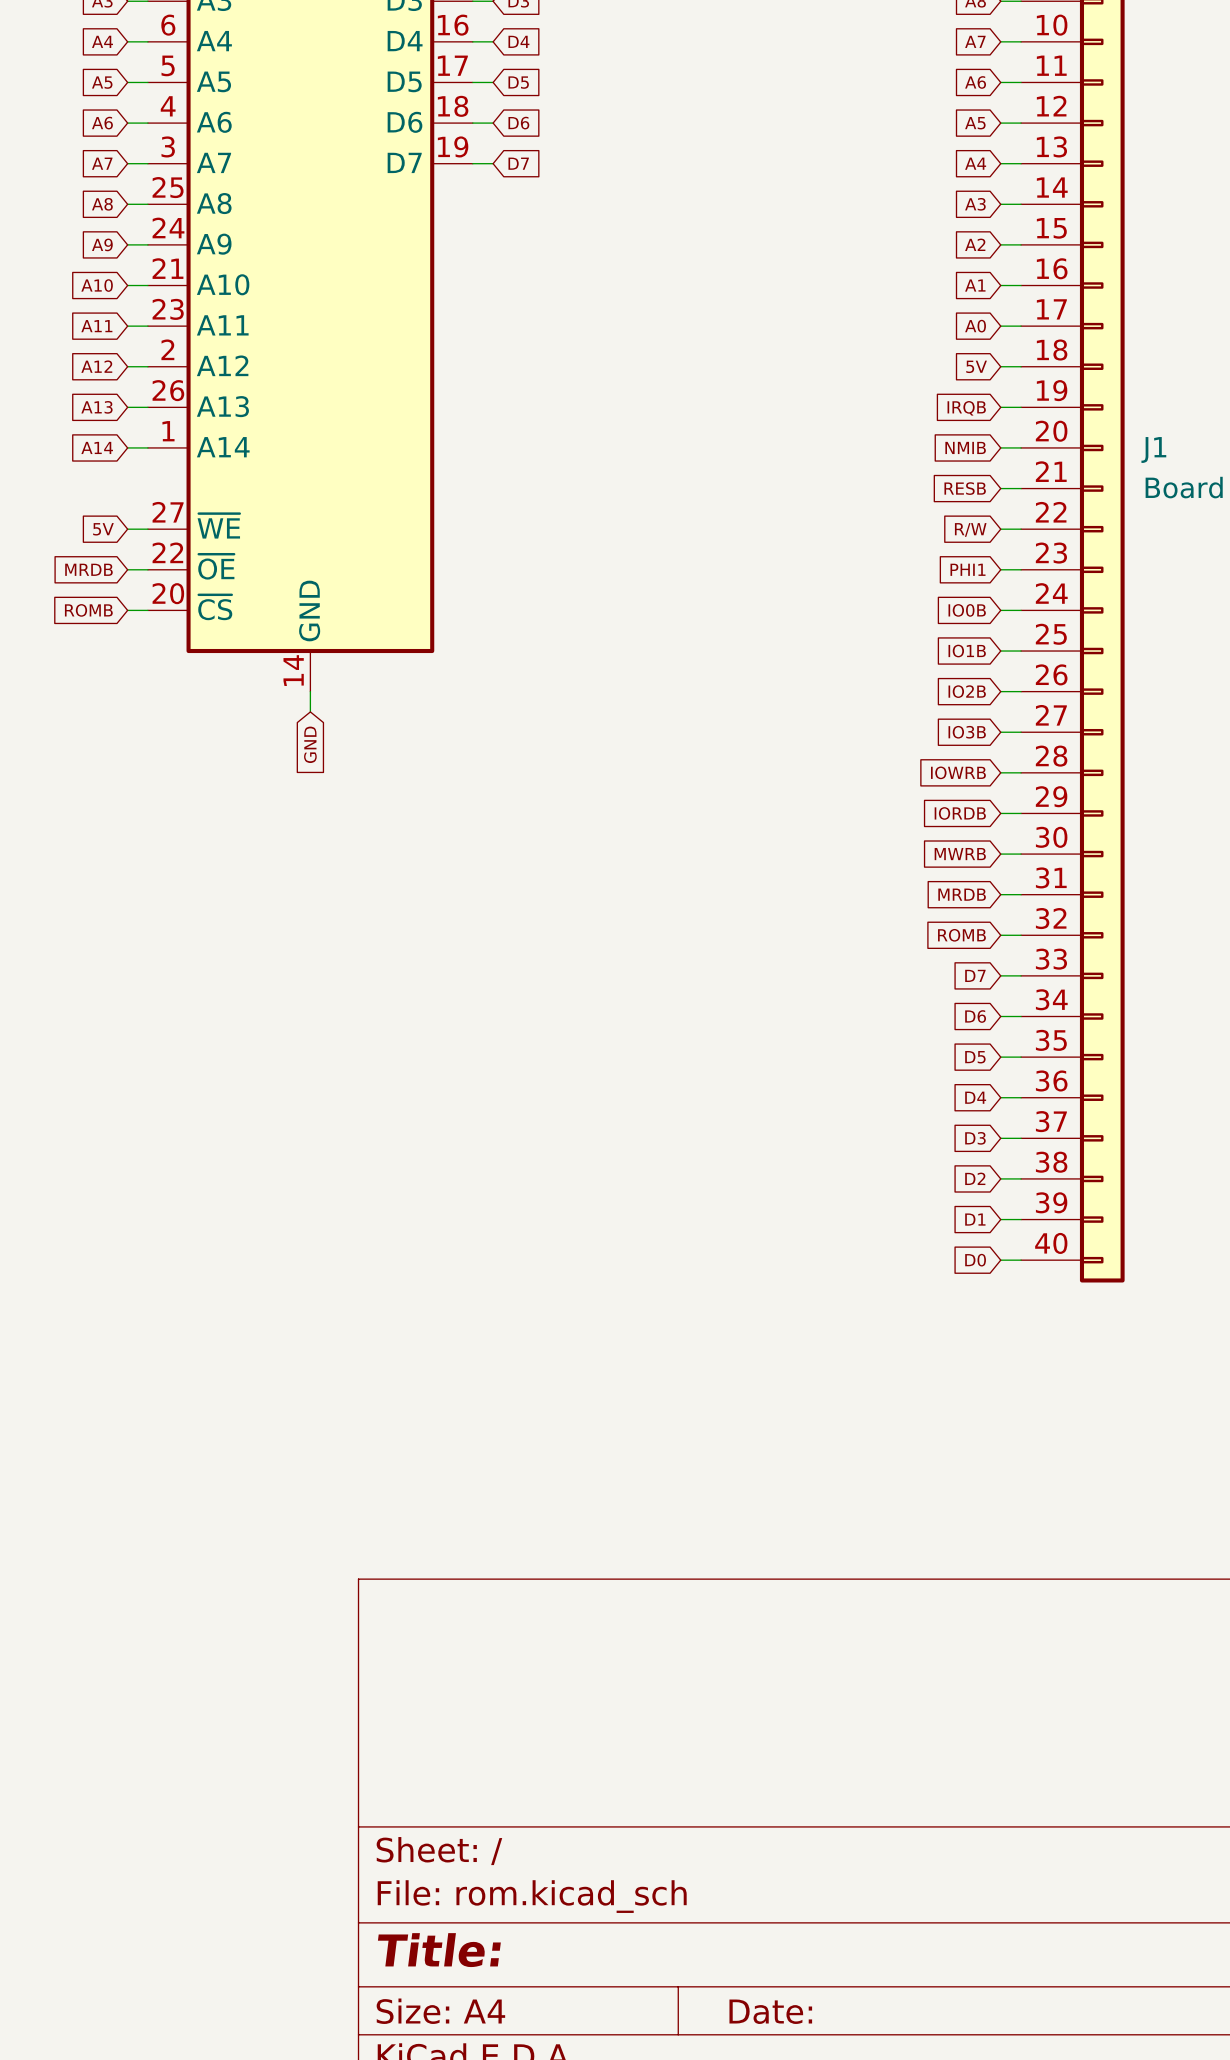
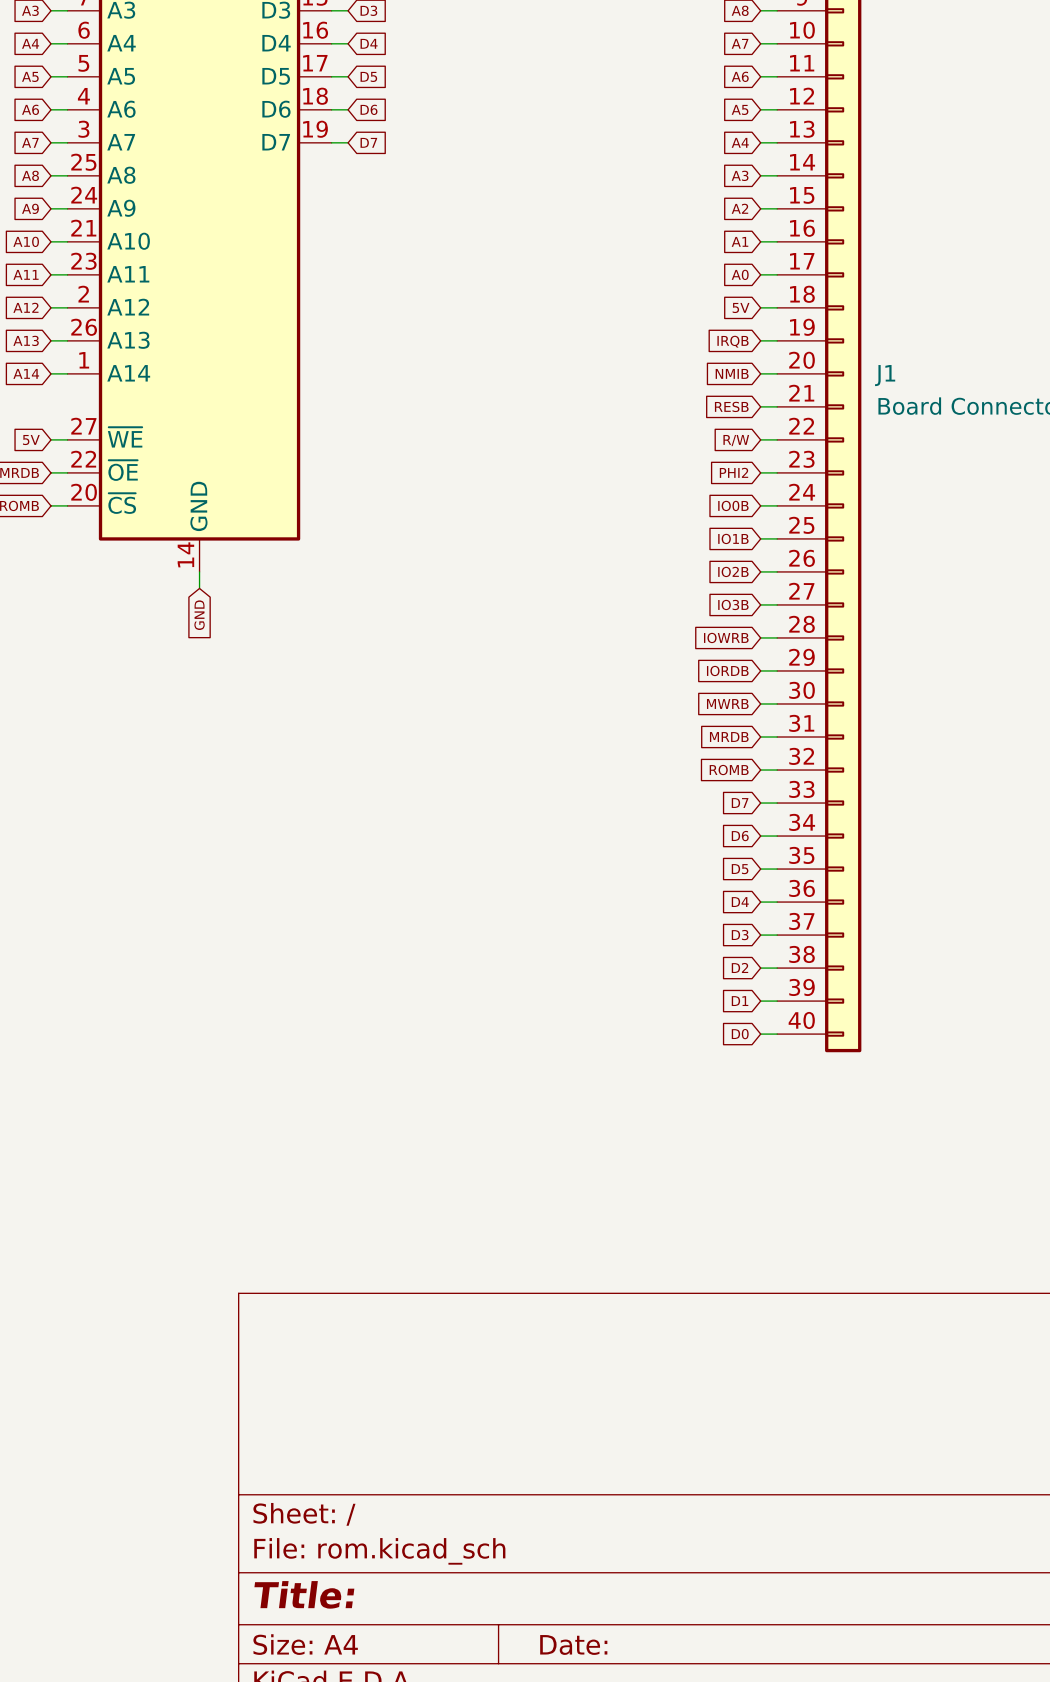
global label: PHI1 (968, 569) -> PHI2 (734, 472)

